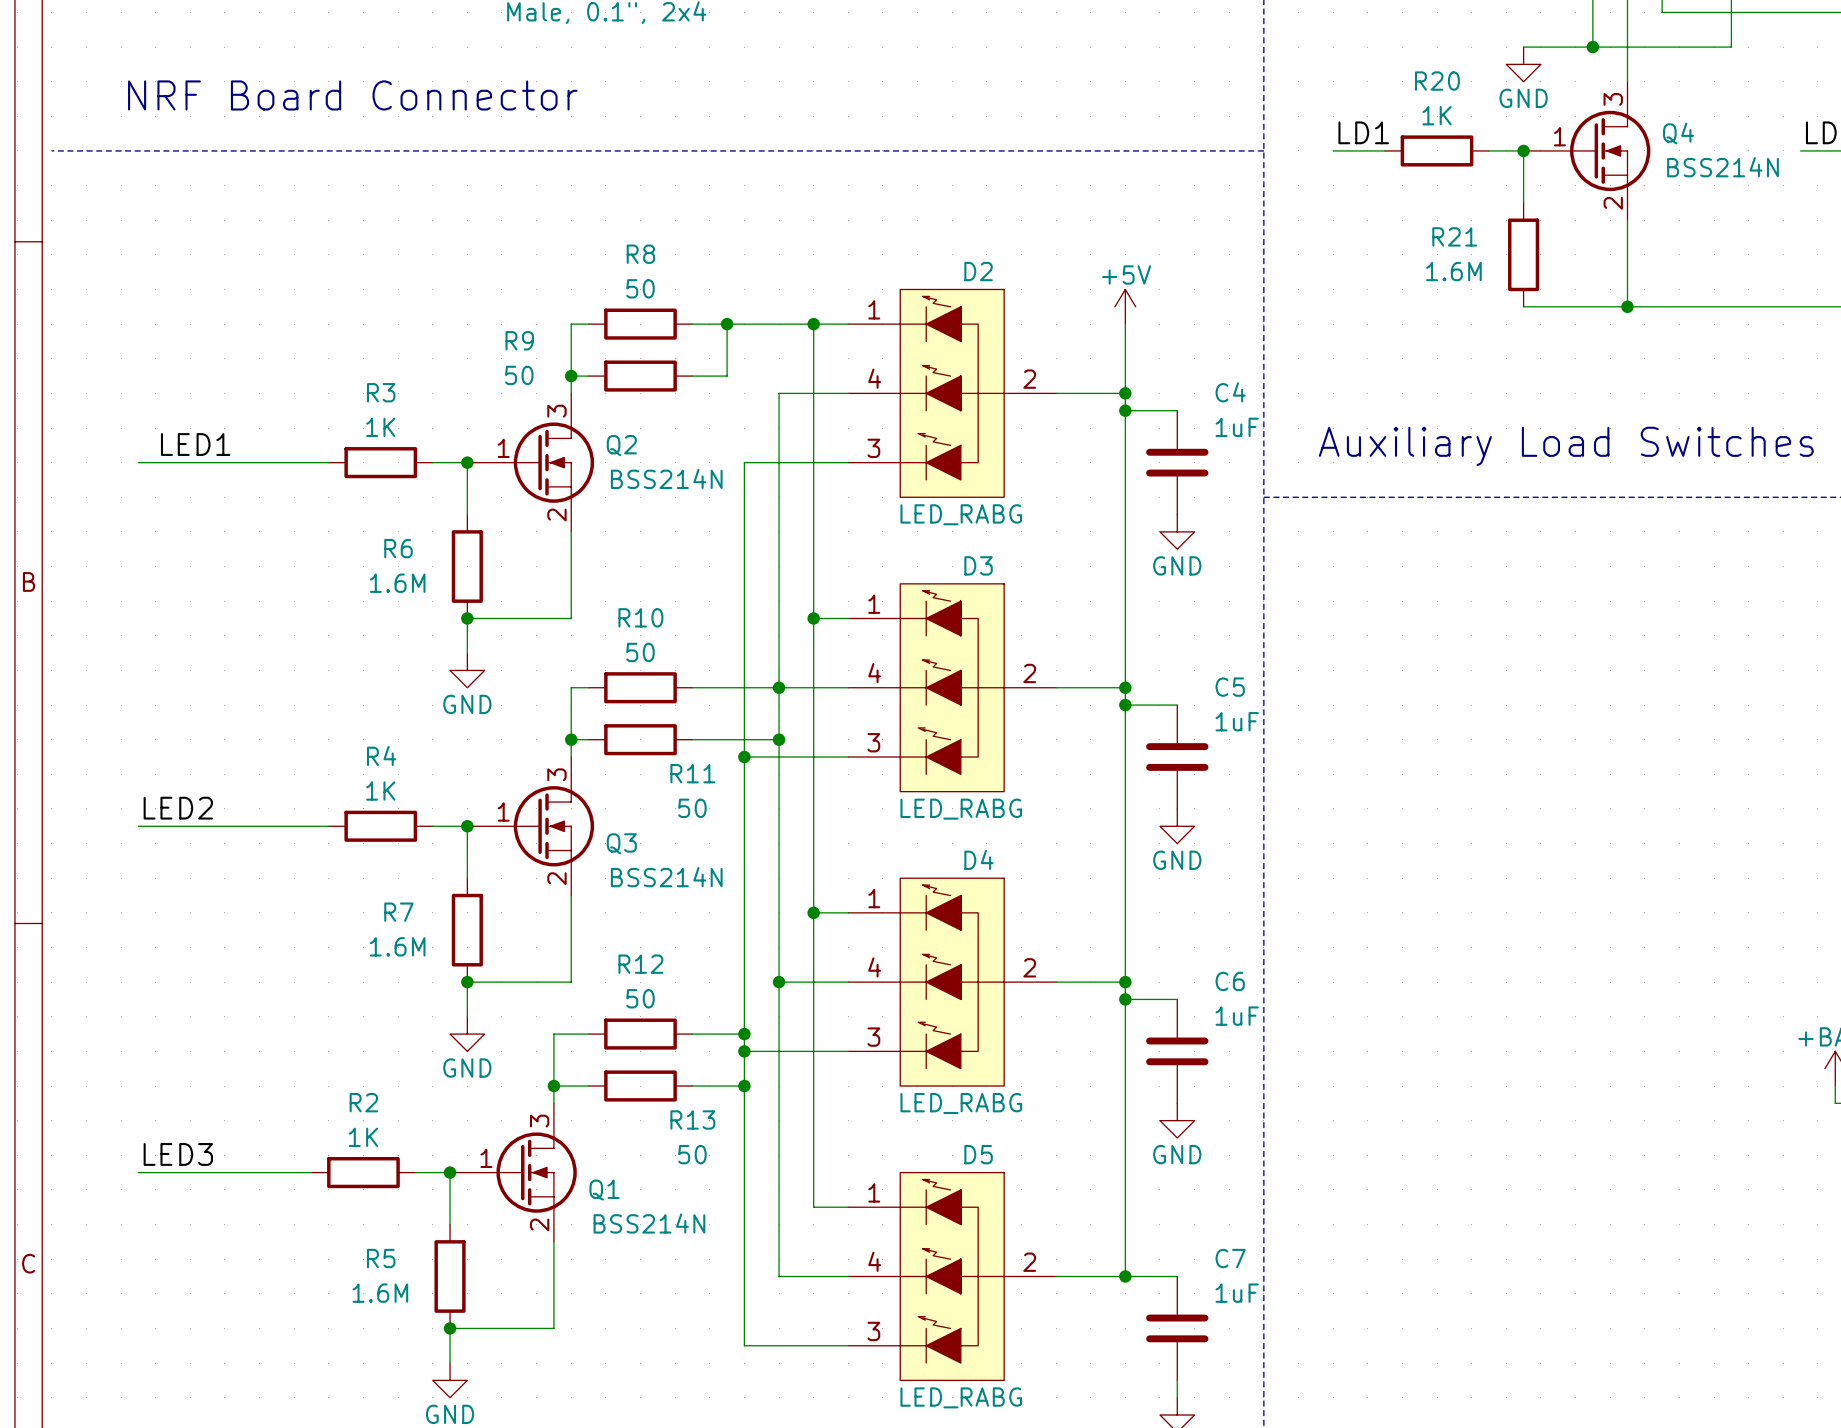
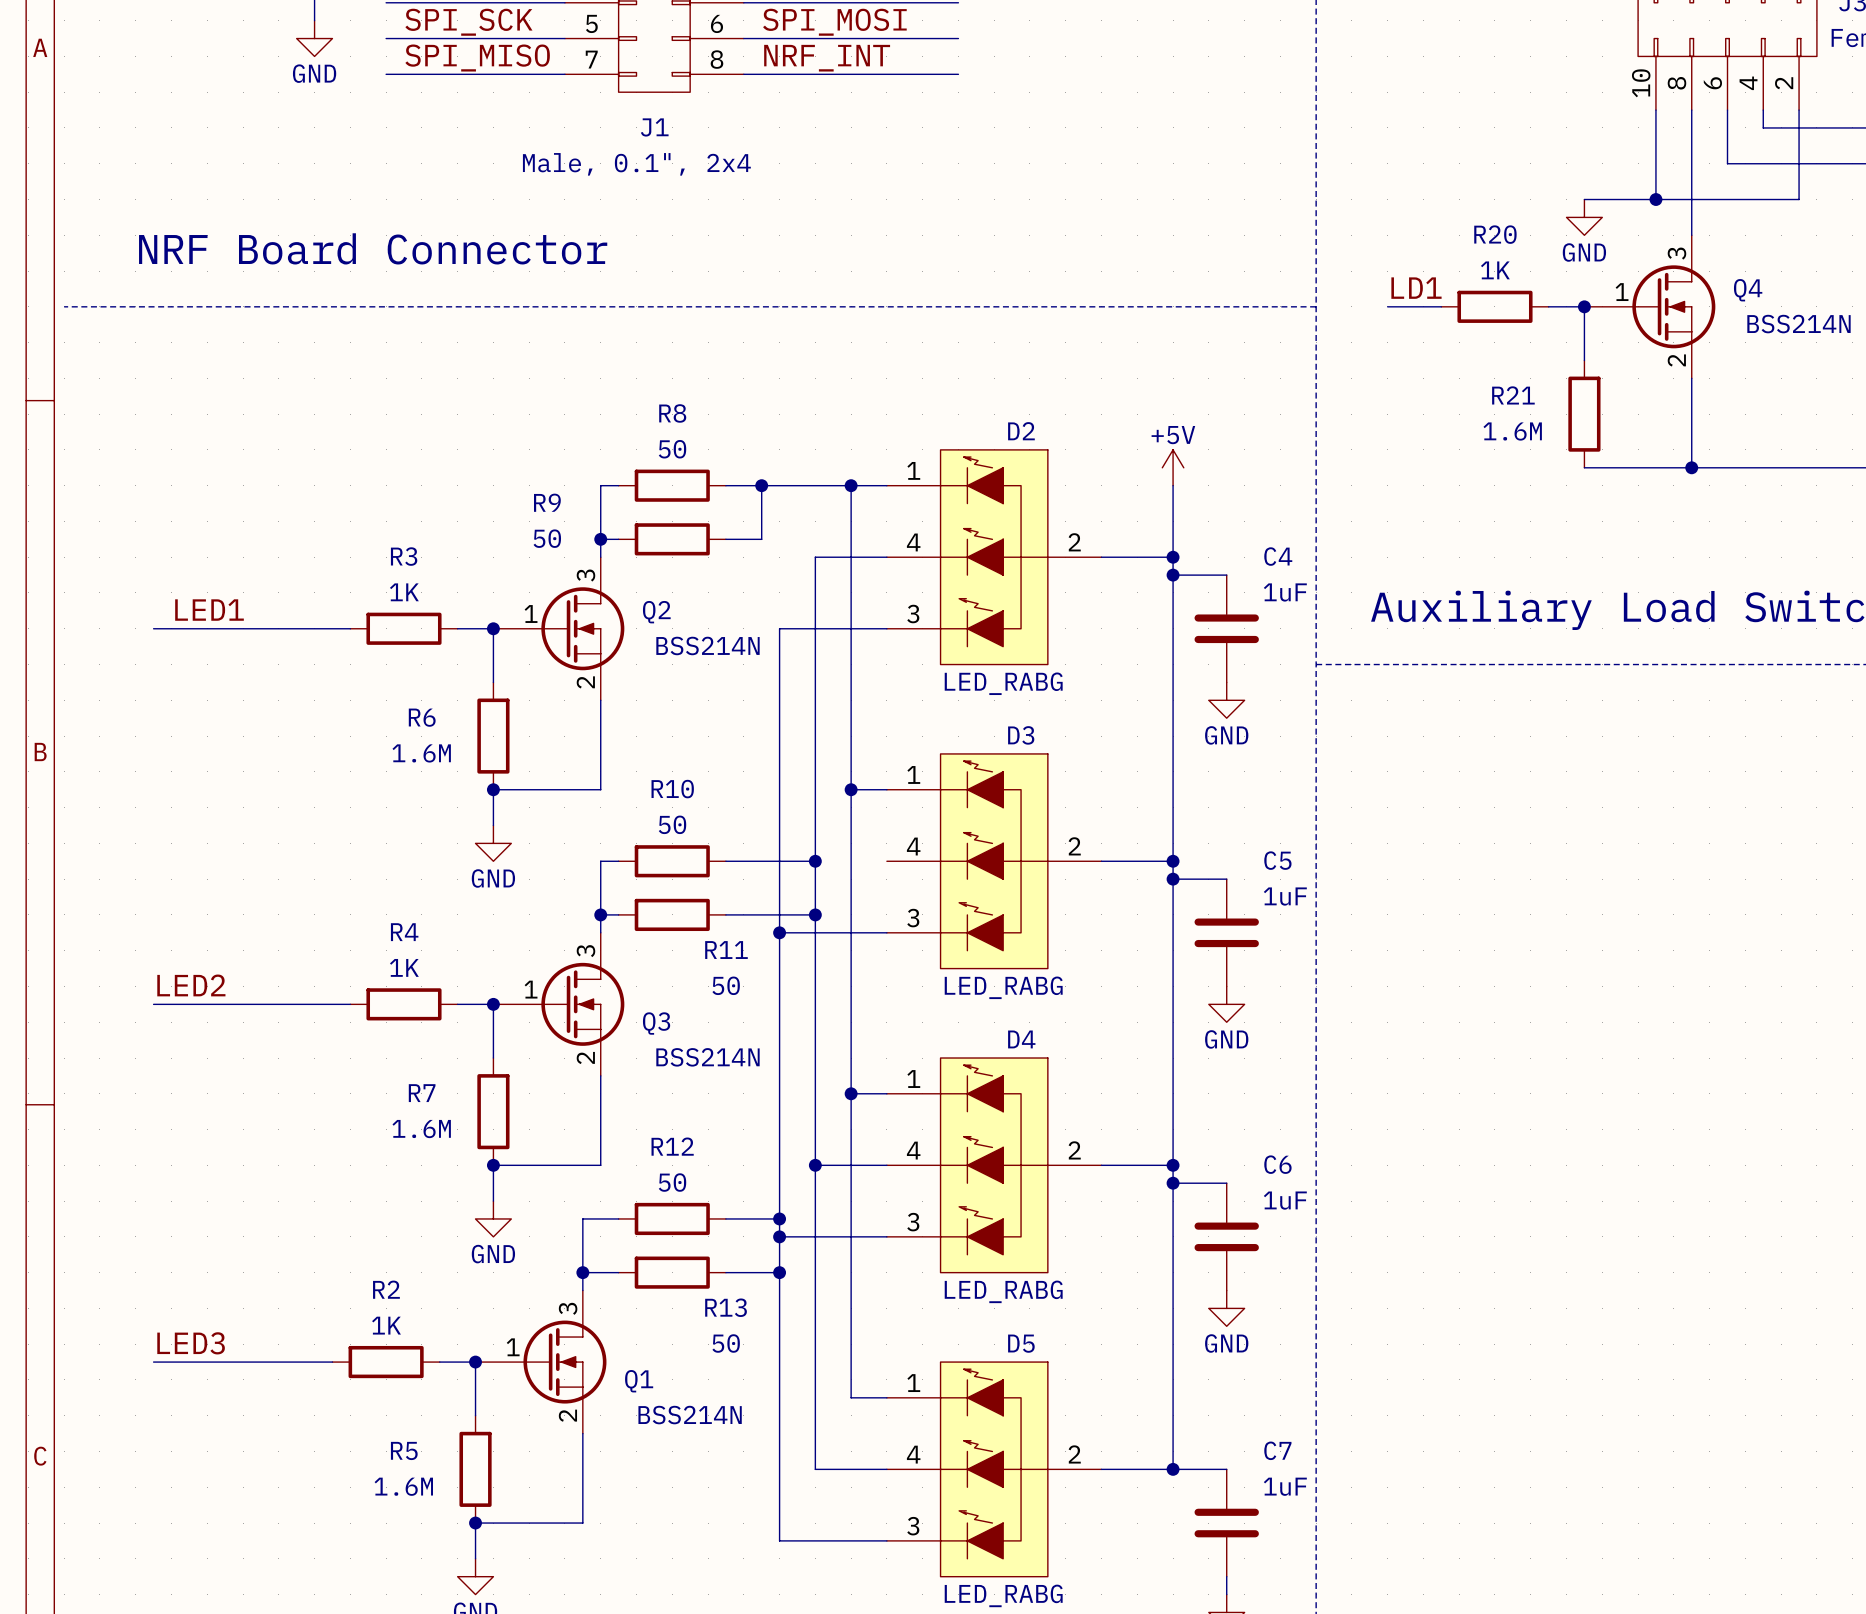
wire: (779, 687) (848, 687) -> none

